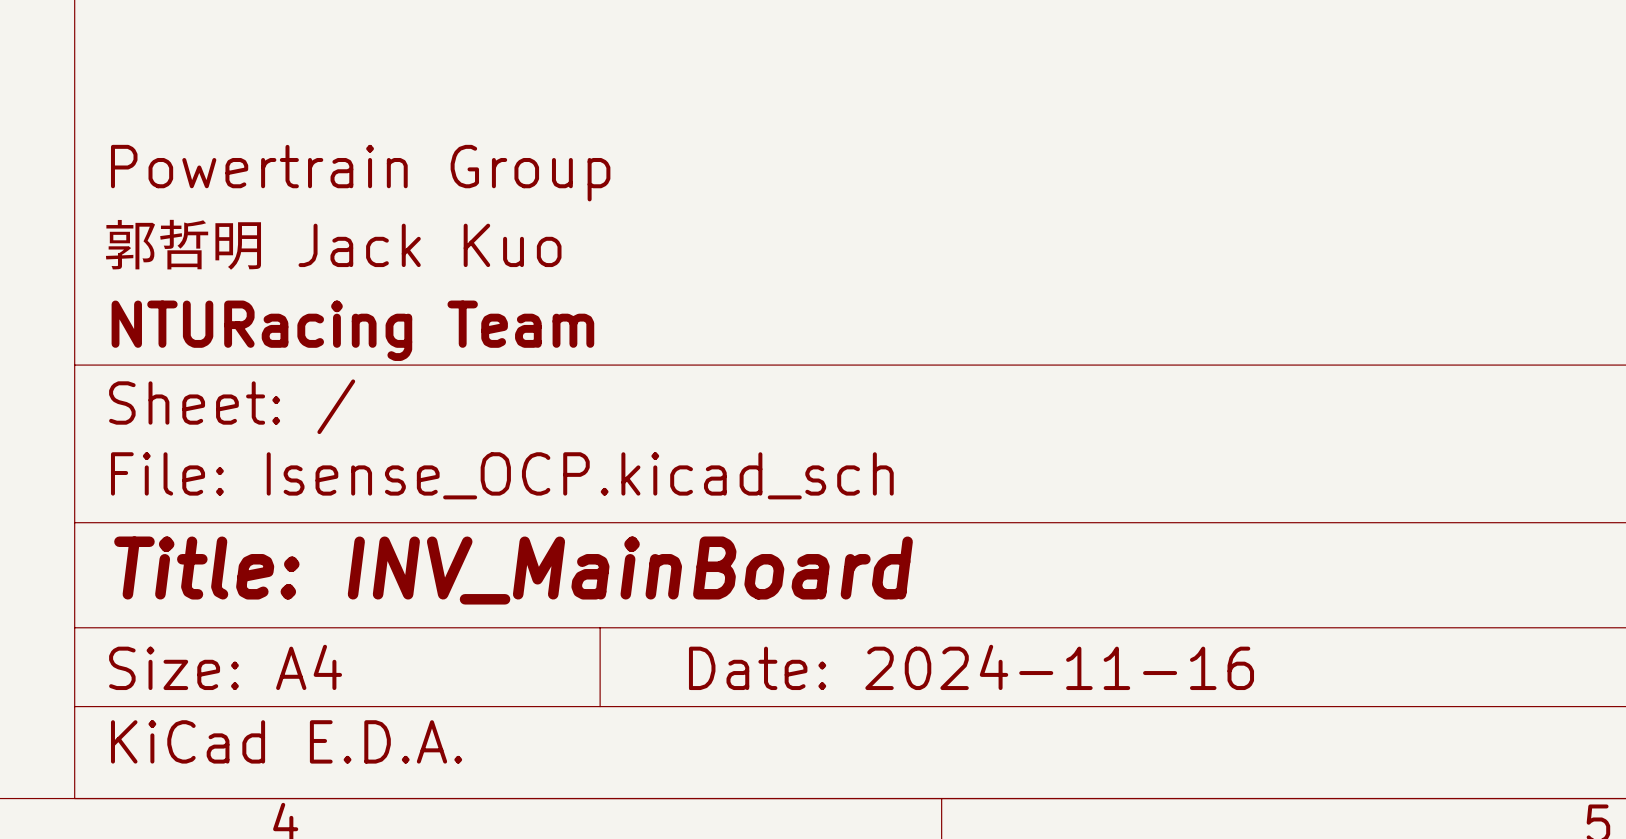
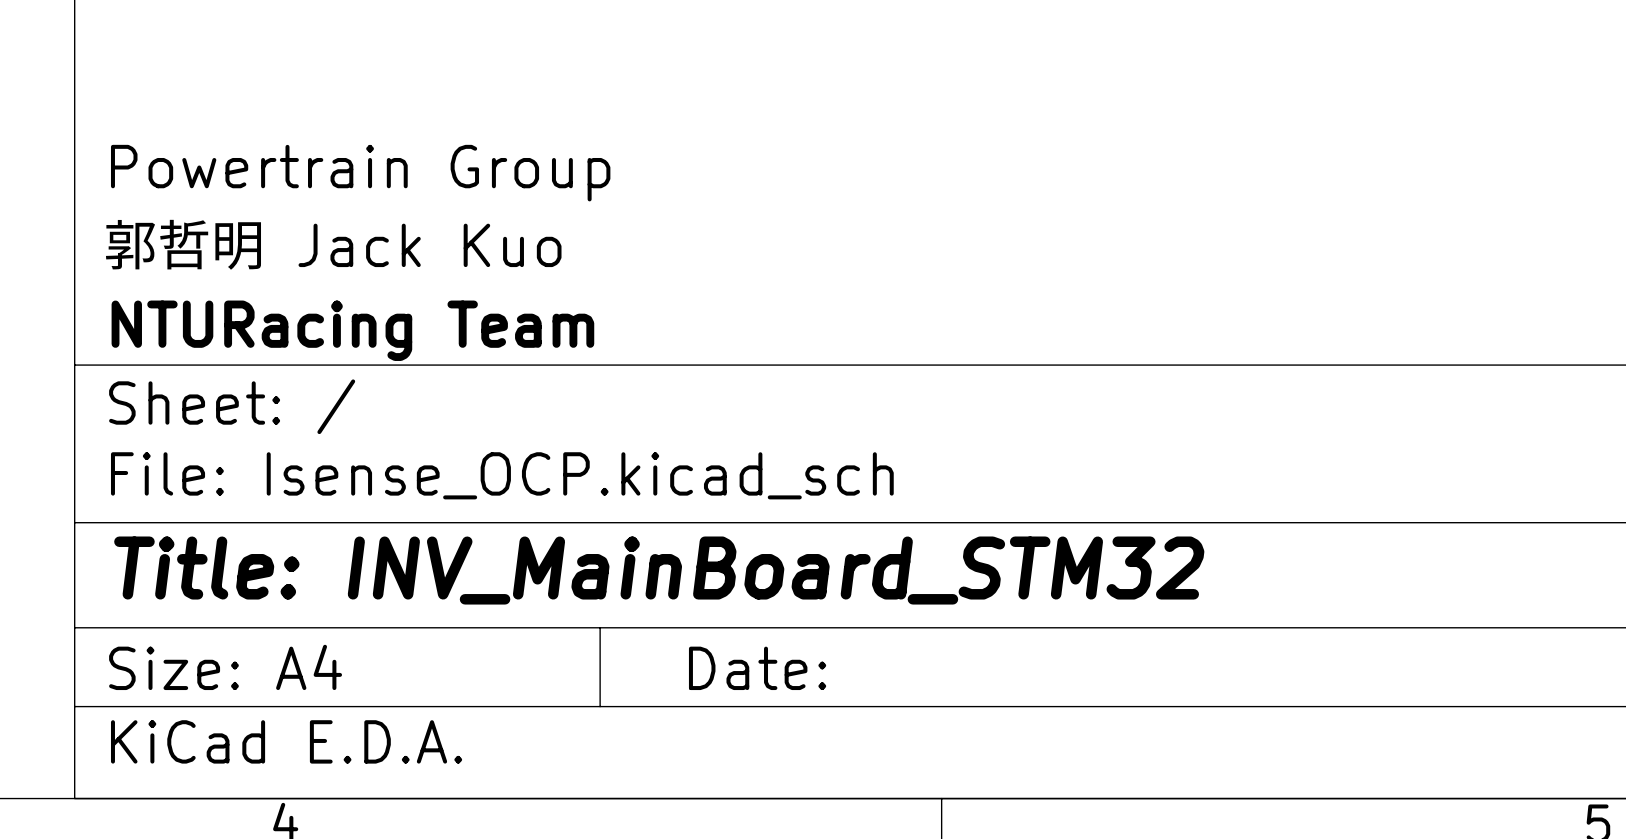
title block: Title: INV_MainBoard (513, 570) -> Title: INV_MainBoard_STM32 (659, 570)
title block: Date: 2024-11-16 (971, 667) -> Date: (757, 668)

